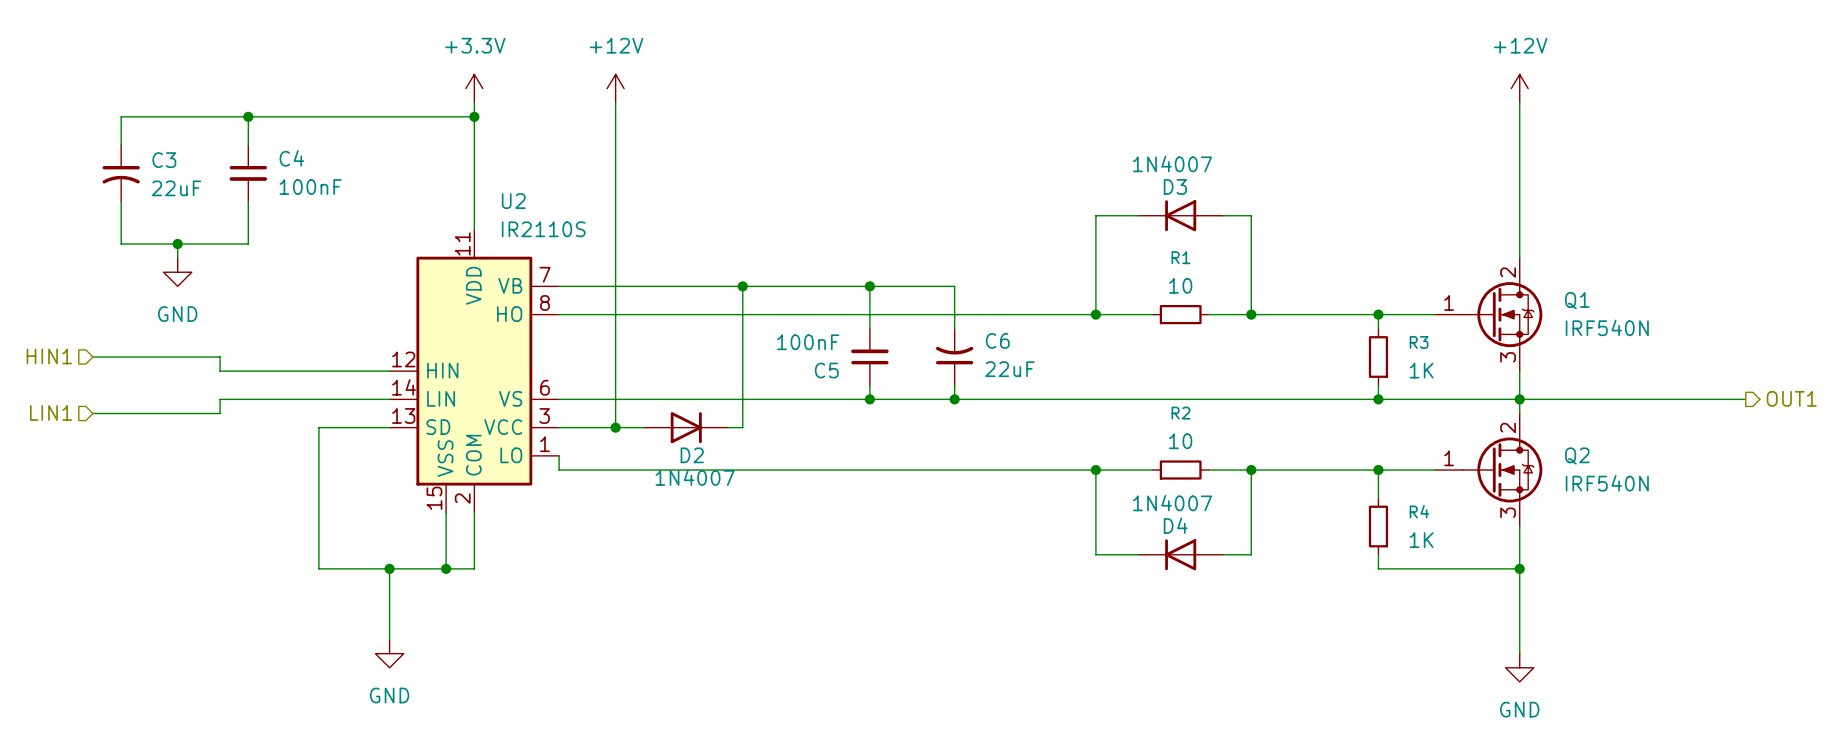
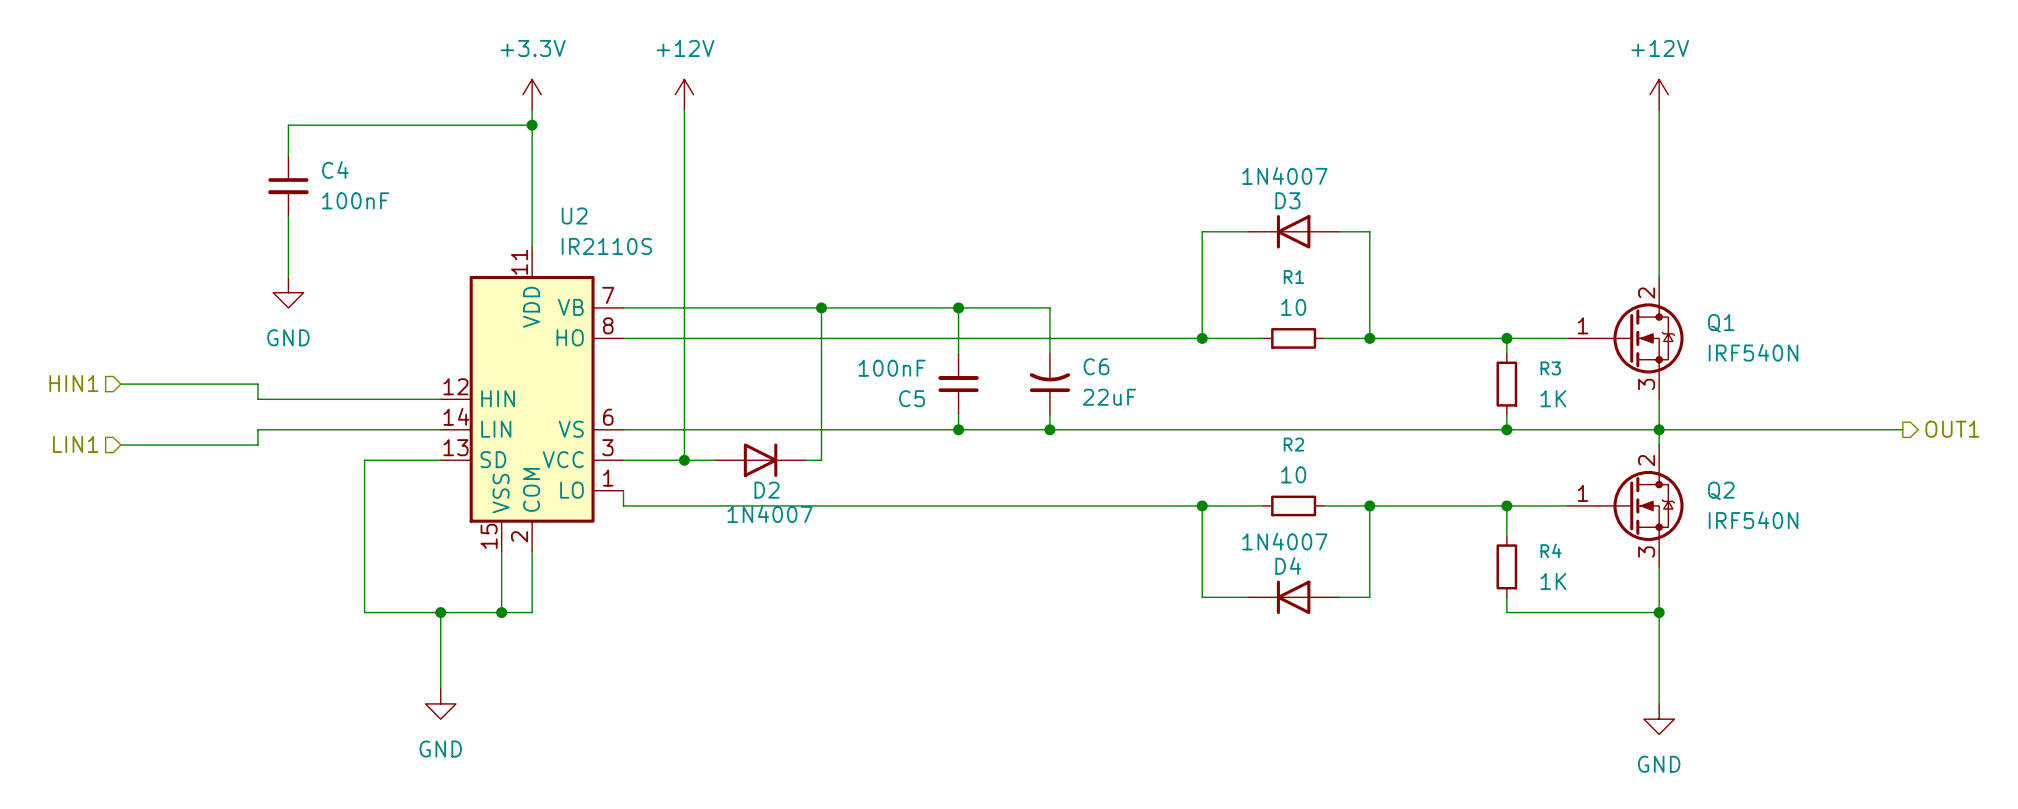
wire: (248, 116) (121, 116) (121, 145) -> none
junction: (248, 116) -> none
C3: 22uF (121, 173) -> none
wire: (121, 201) (121, 243) (248, 243) -> (288, 277) (288, 262)
wire: (177, 243) (177, 258) -> none
junction: (177, 243) -> none
power symbol position: GND (177, 272) -> GND (288, 292)

